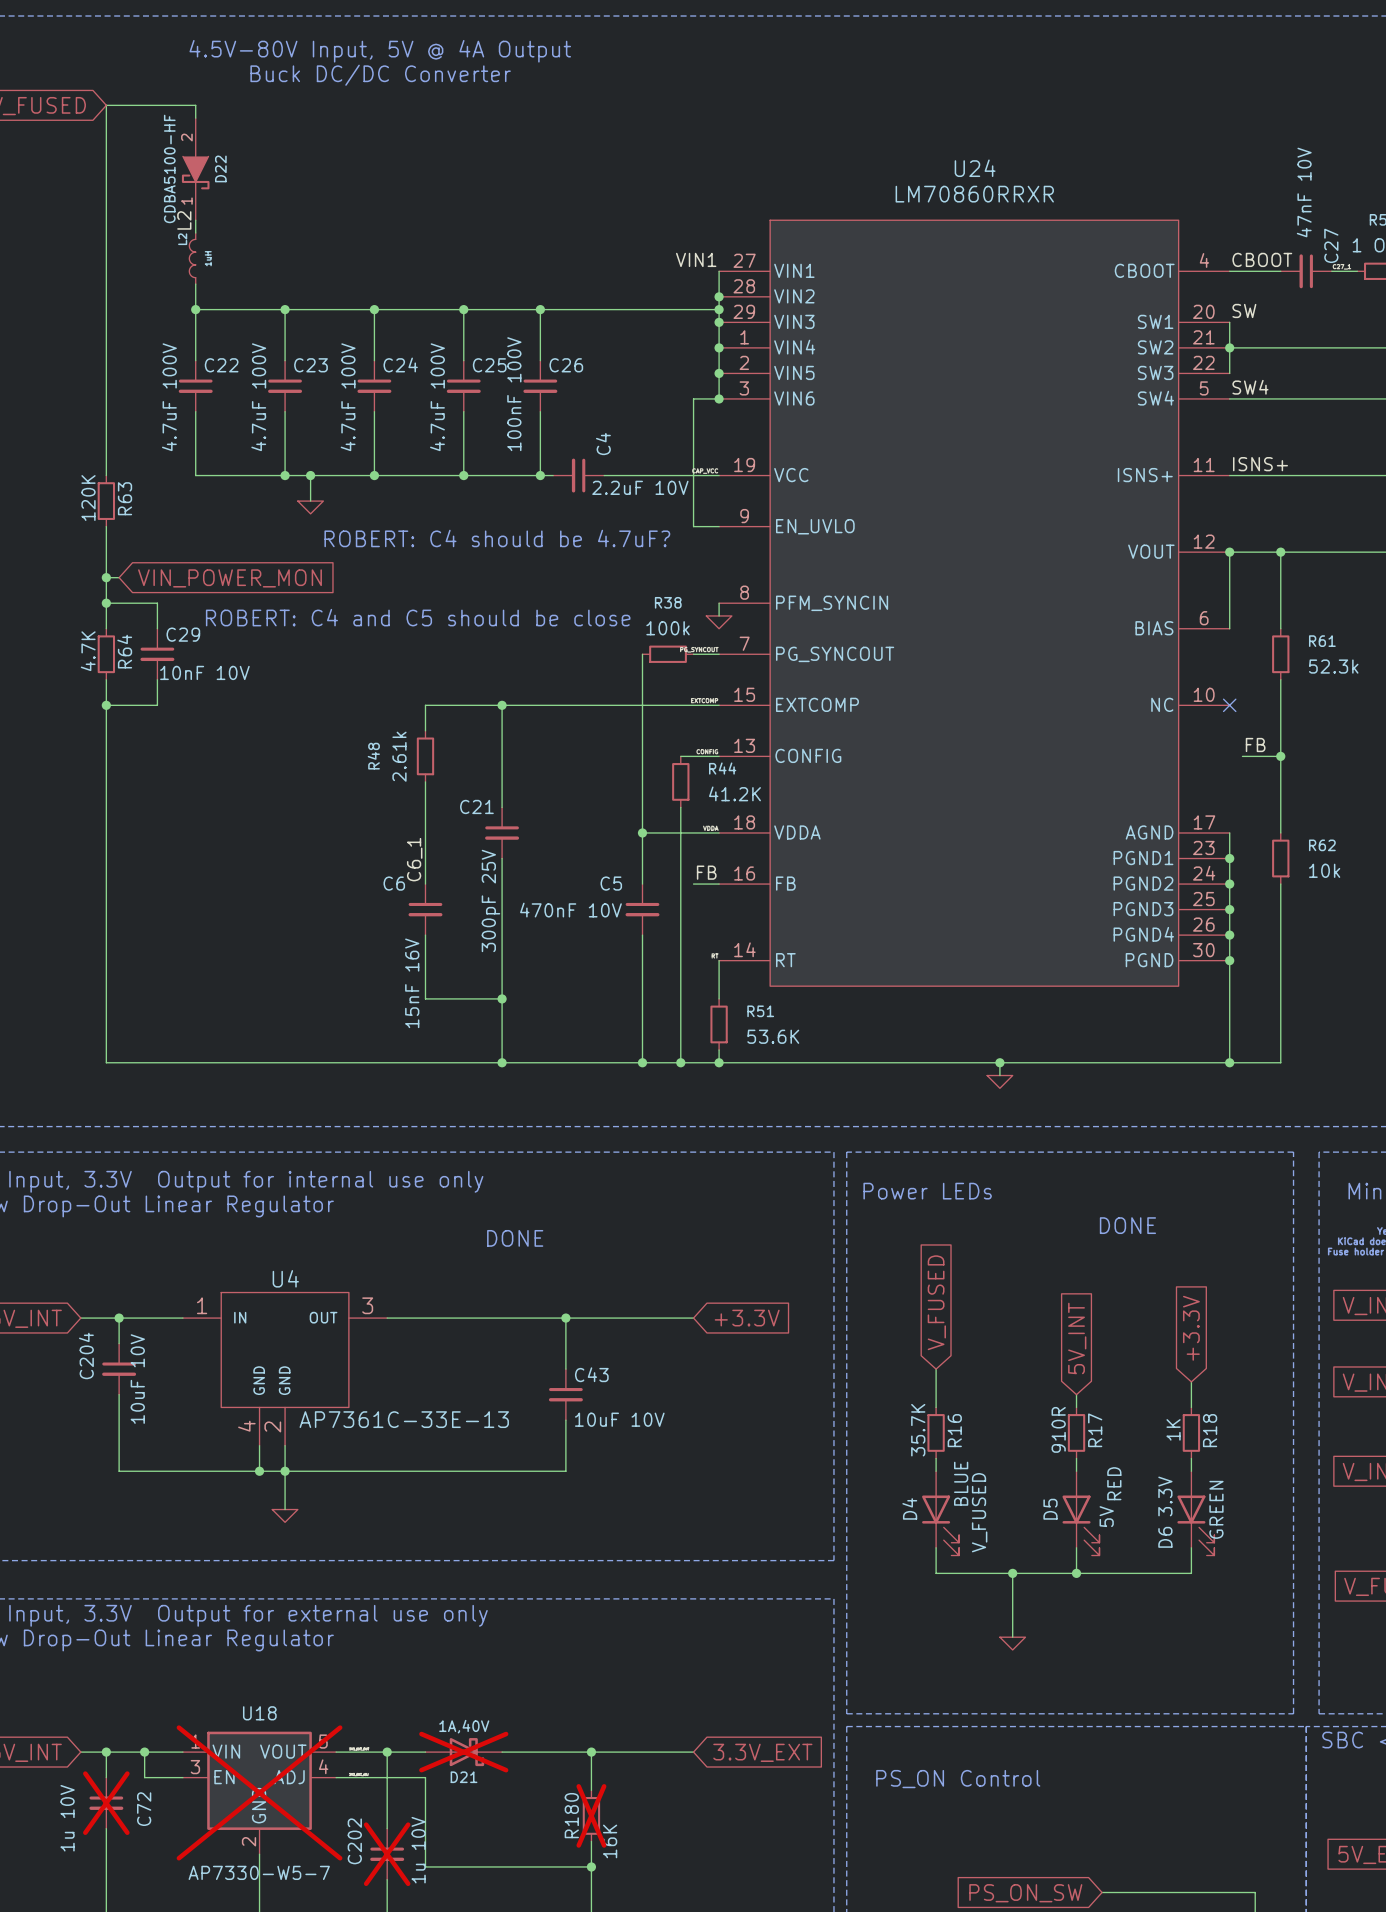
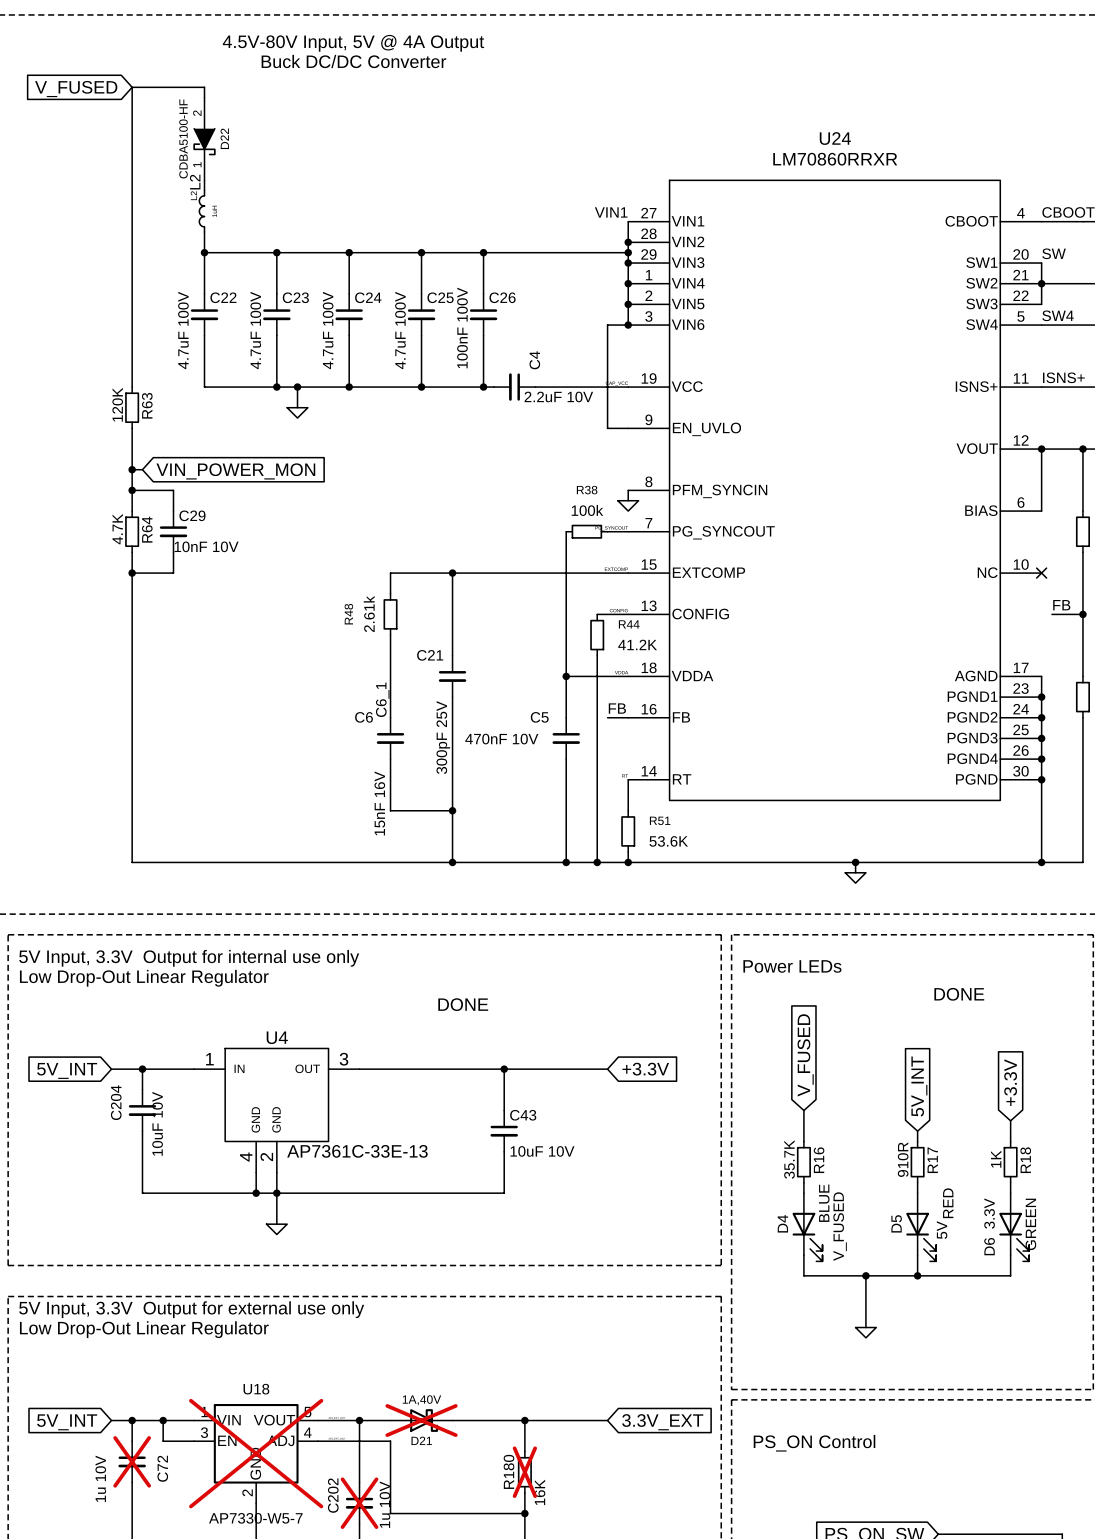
text: ROBERT: C4 should be 4.7uF? (497, 538) -> none
text: ROBERT: C4 and C5 should be close (418, 617) -> none

